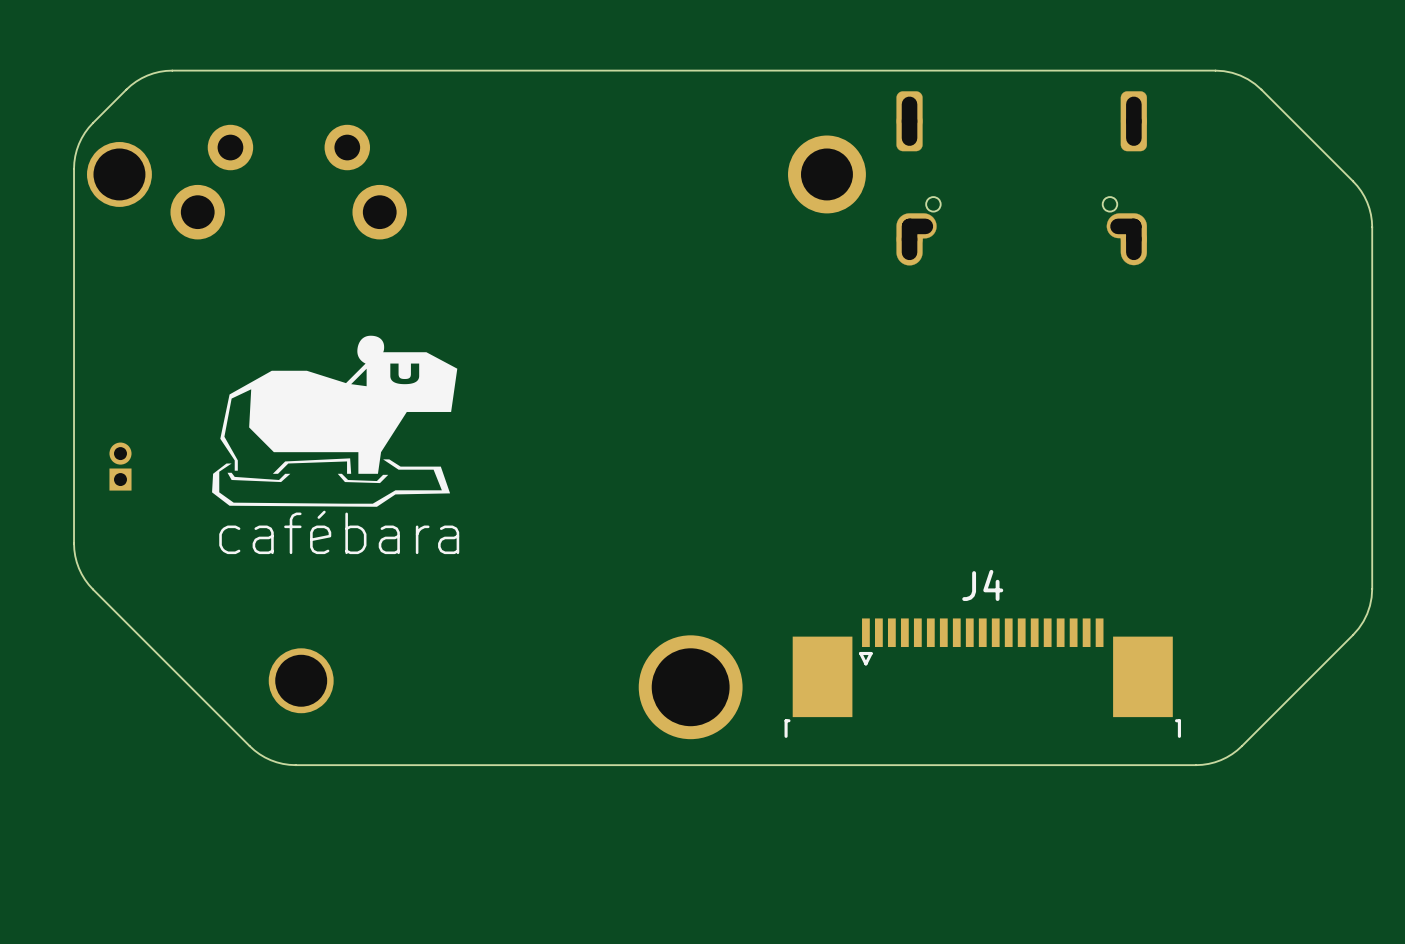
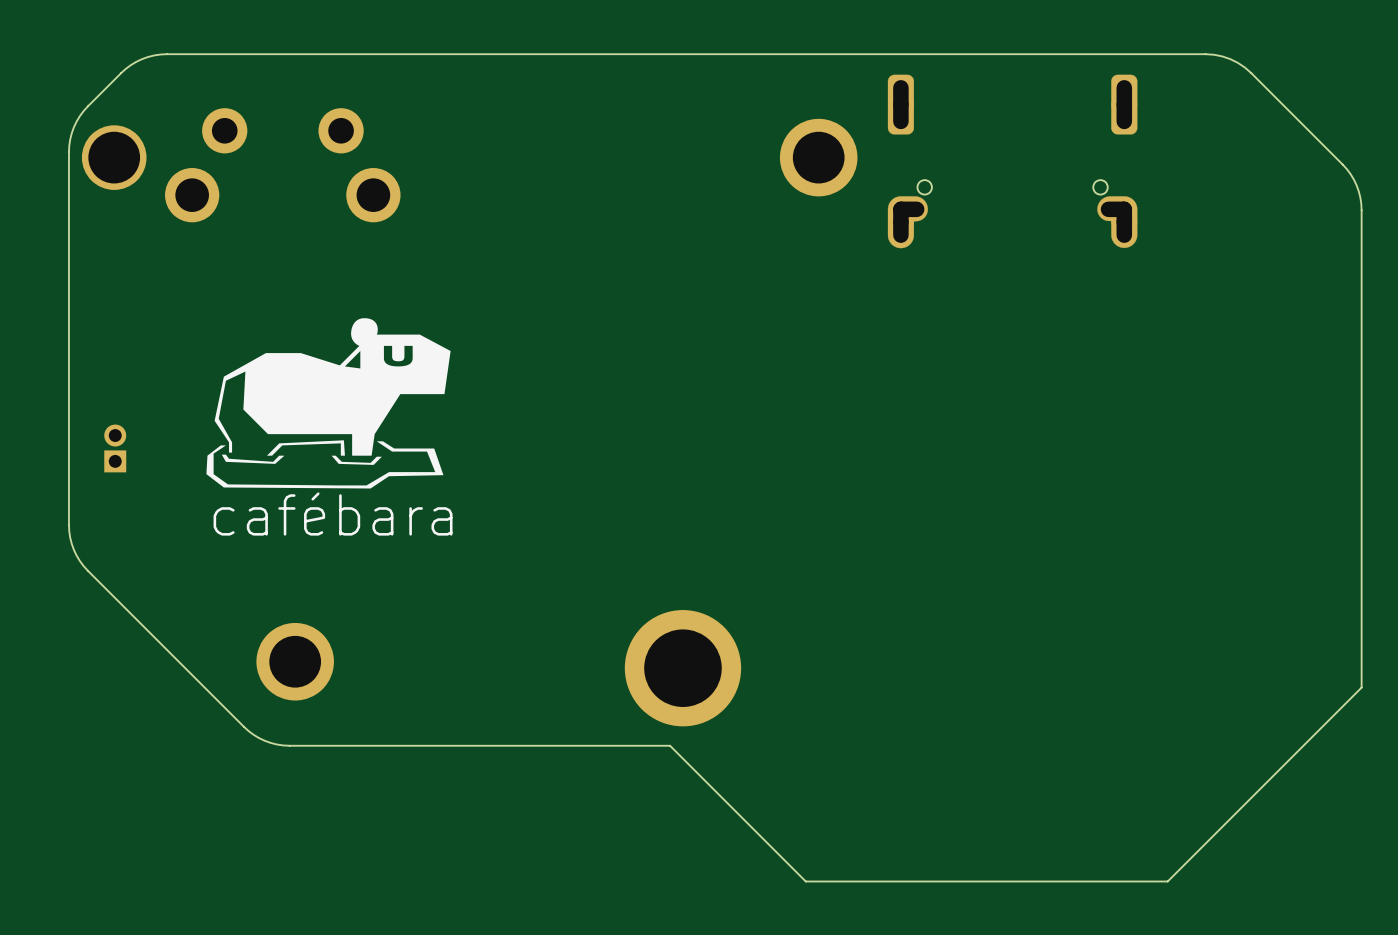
board edge: (1372, 588) (1367, 613) (1353, 634) (1241, 746) (1232, 754) (1214, 762) (1196, 765) (677, 765) -> (1361, 570) (1361, 687) (1167, 881) (805, 881) (670, 745)
part footprint: [638, 635, 743, 740] -> [624, 610, 742, 727]
part footprint: [268, 648, 334, 714] -> [256, 622, 334, 701]
J4: (982, 678) -> none

